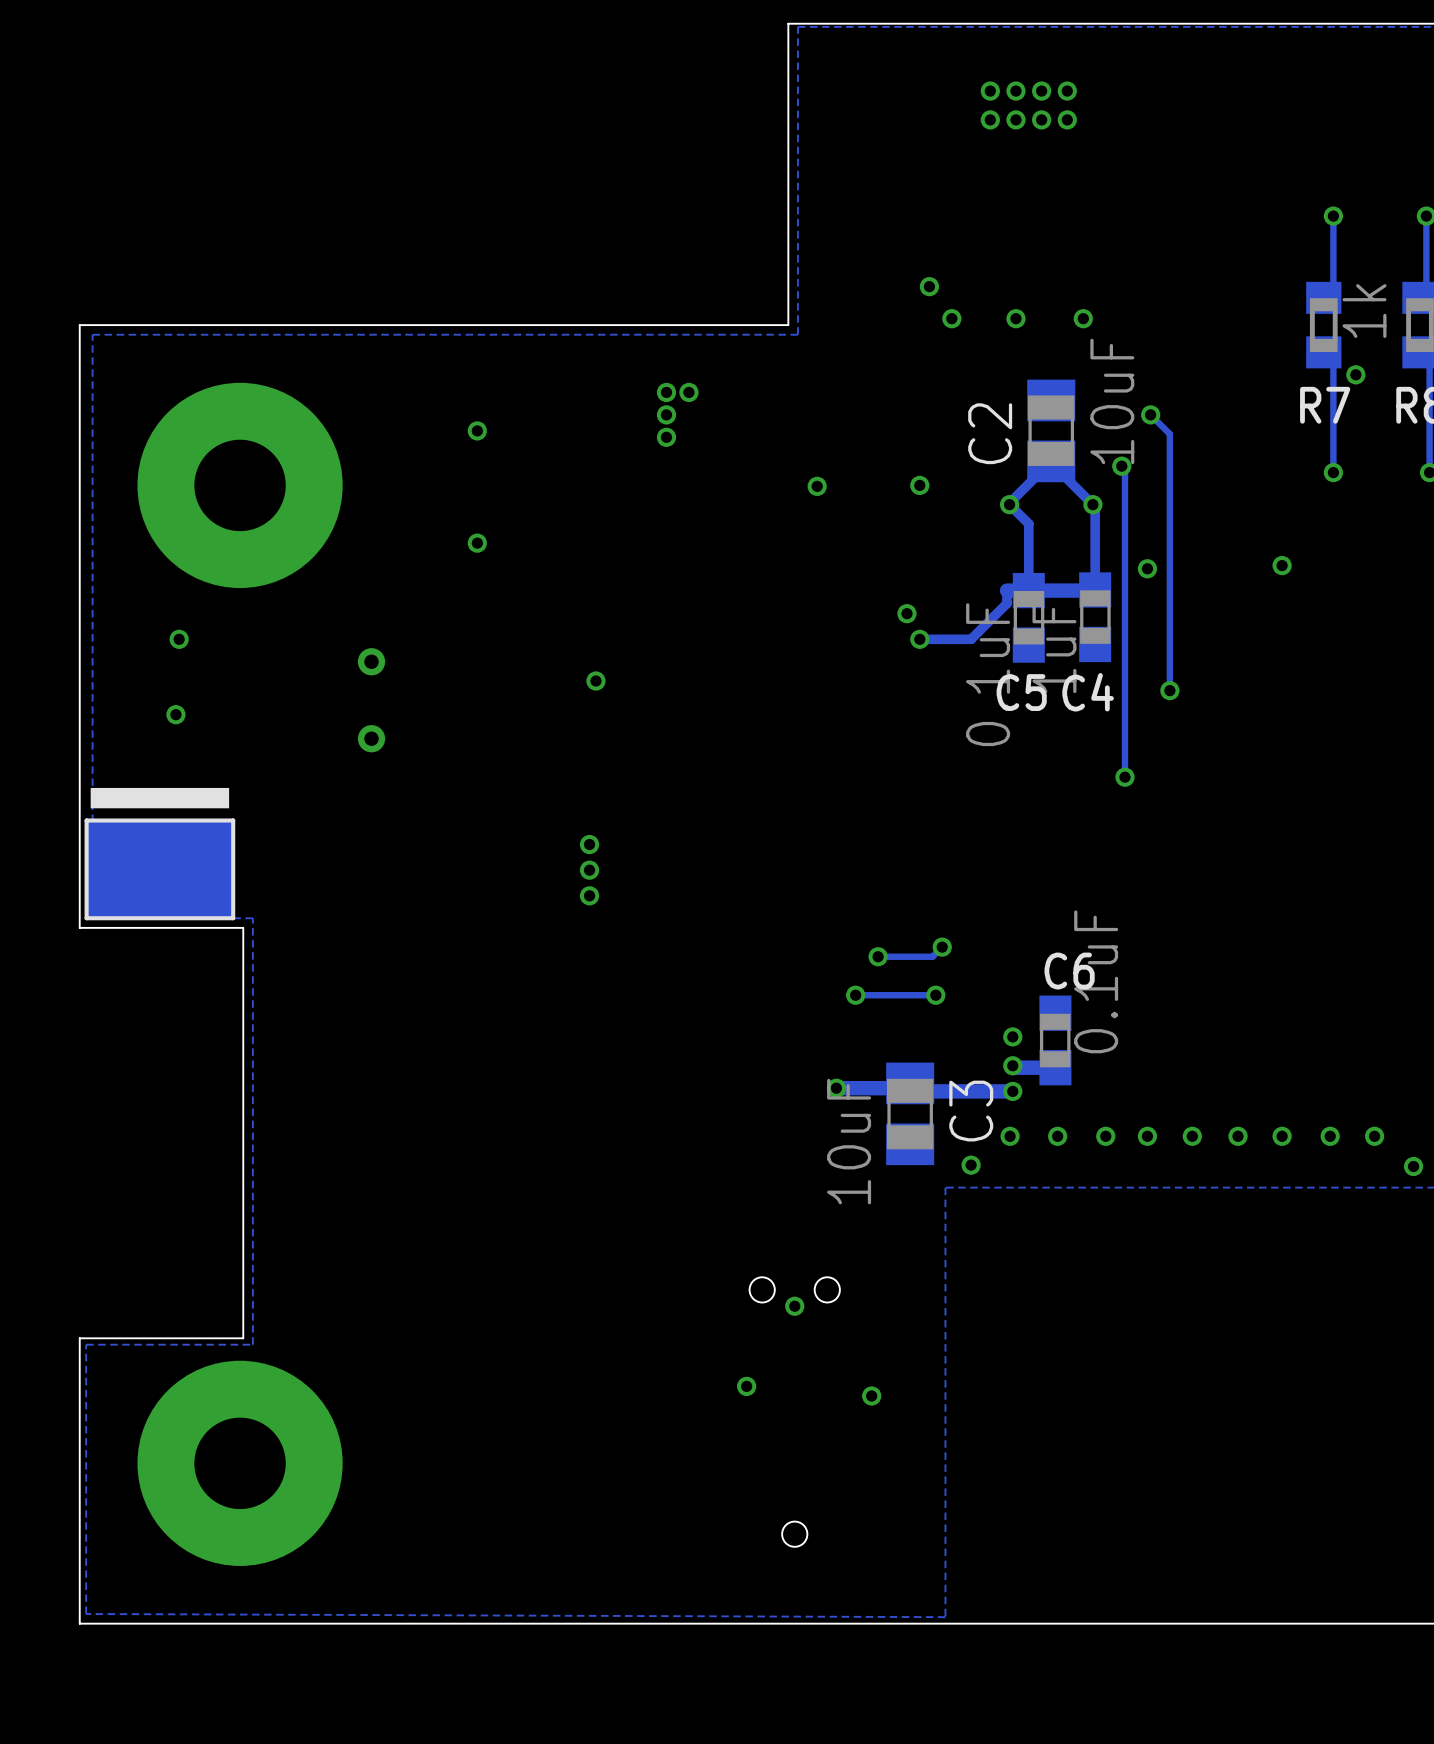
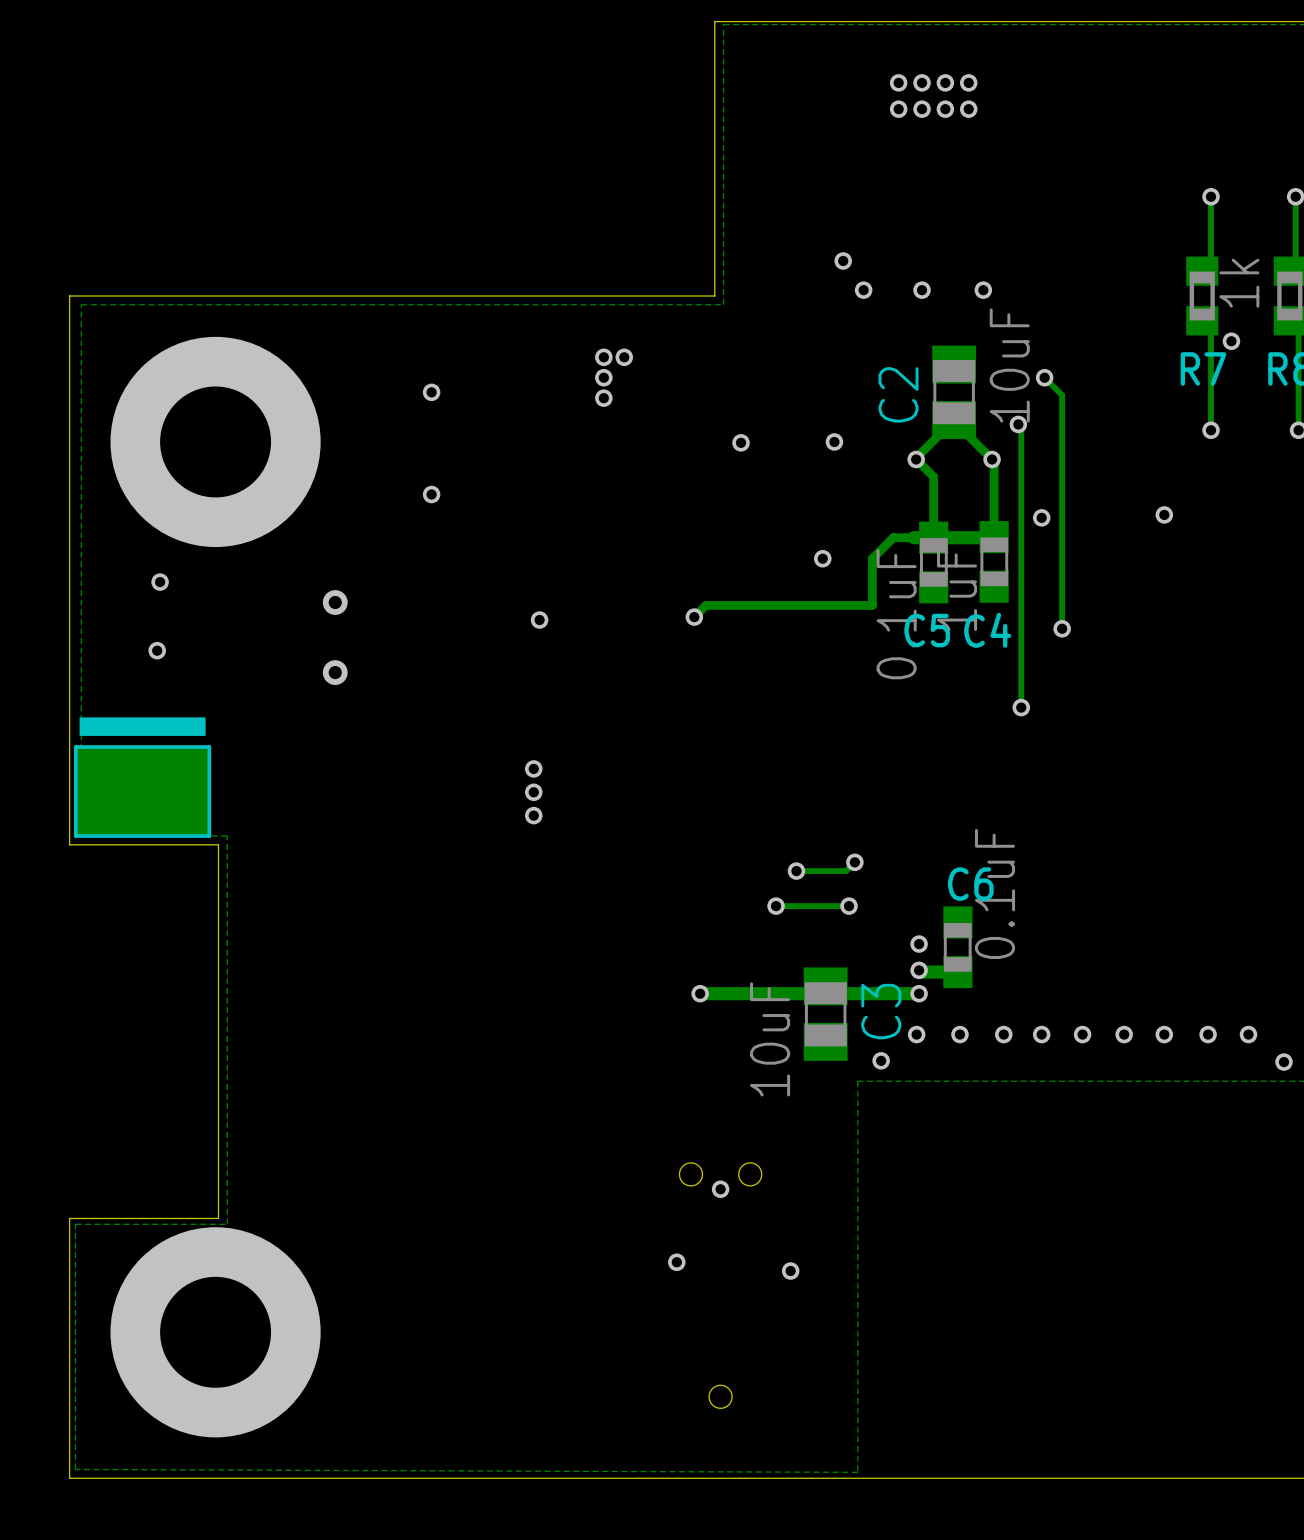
via size: [137, 382, 343, 589] -> [110, 336, 321, 548]
track: (1007, 590) (1007, 603) (971, 639) (919, 639) -> (913, 537) (893, 537) (872, 558) (872, 605) (706, 605) (694, 617)
via position: (919, 639) -> (694, 617)
via position: (836, 1088) -> (700, 993)
track: (905, 1088) (836, 1088) -> (821, 990) (818, 993) (700, 993)
via size: [137, 1360, 343, 1566] -> [110, 1227, 321, 1438]

